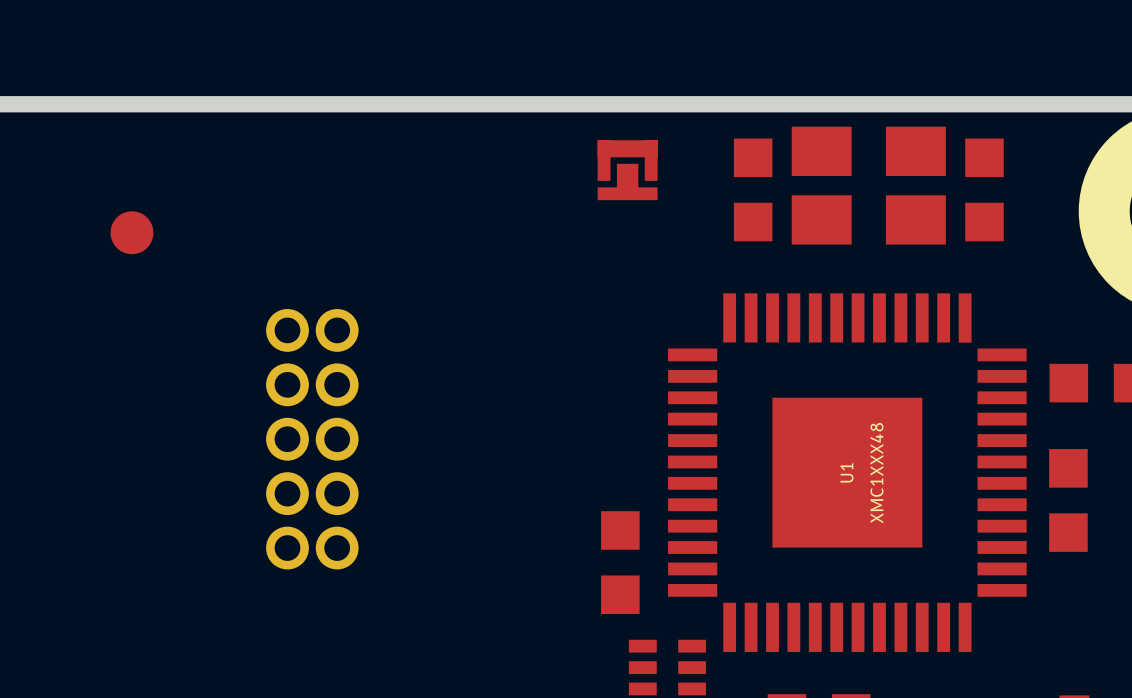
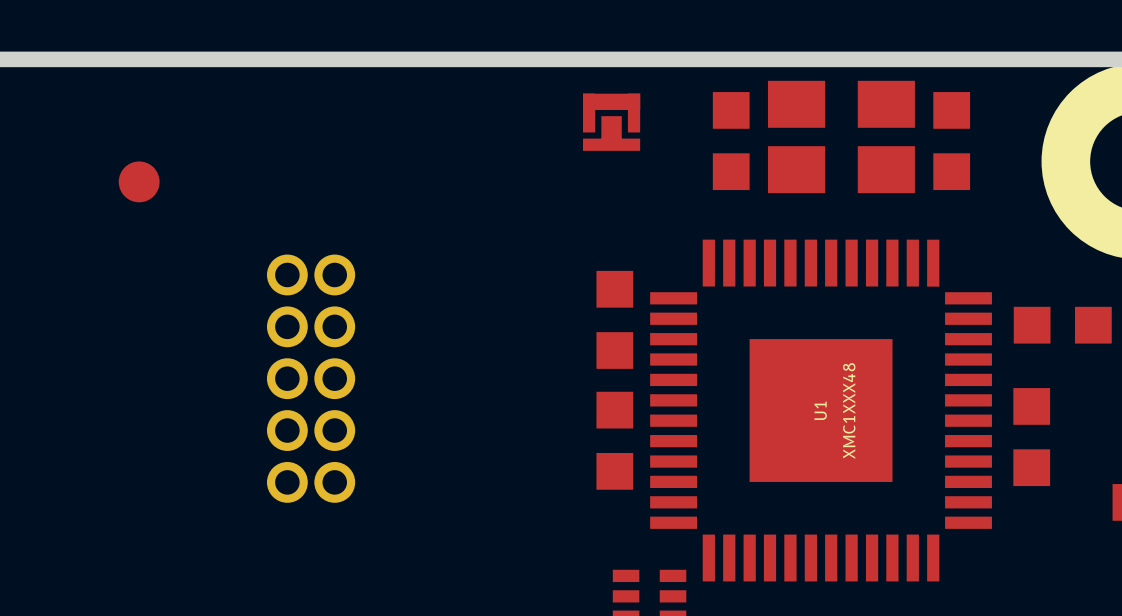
part: none -> (614, 319)
part position: (620, 562) -> (614, 440)

